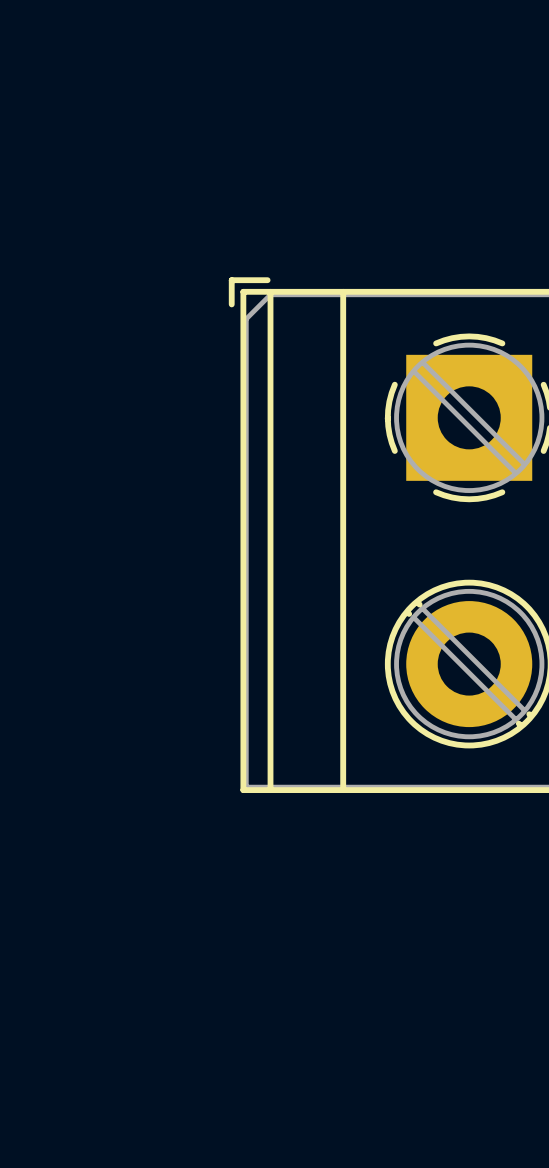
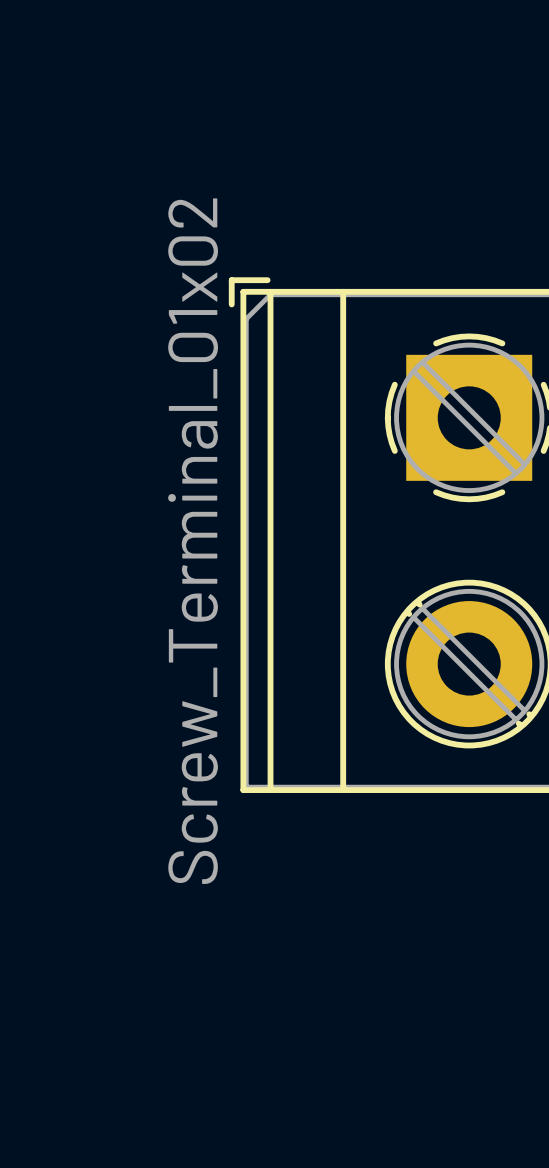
part value: none -> Screw_Terminal_01x02 (193, 541)

